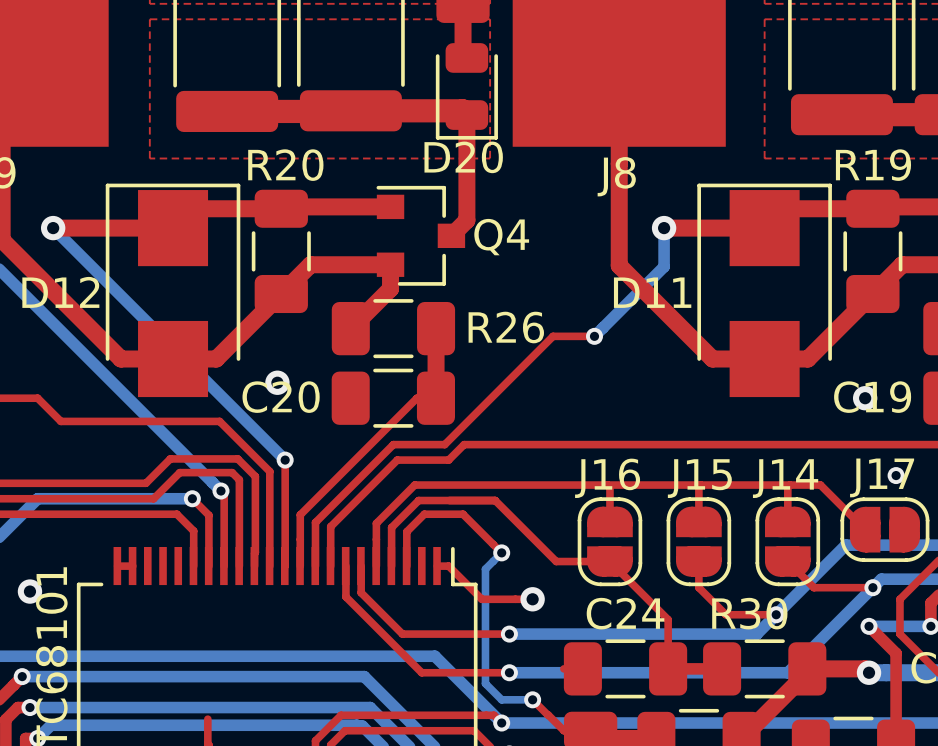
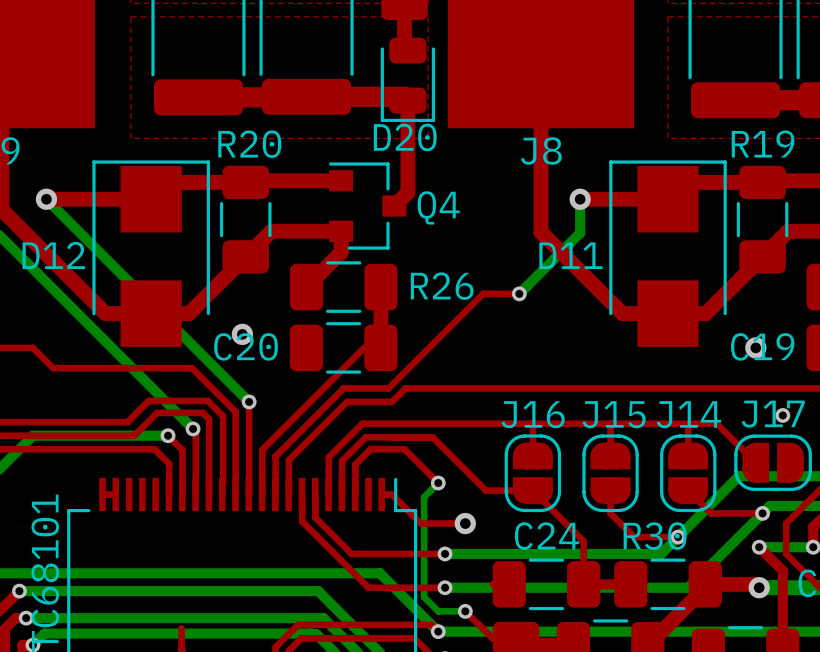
via: (29, 591) -> none

